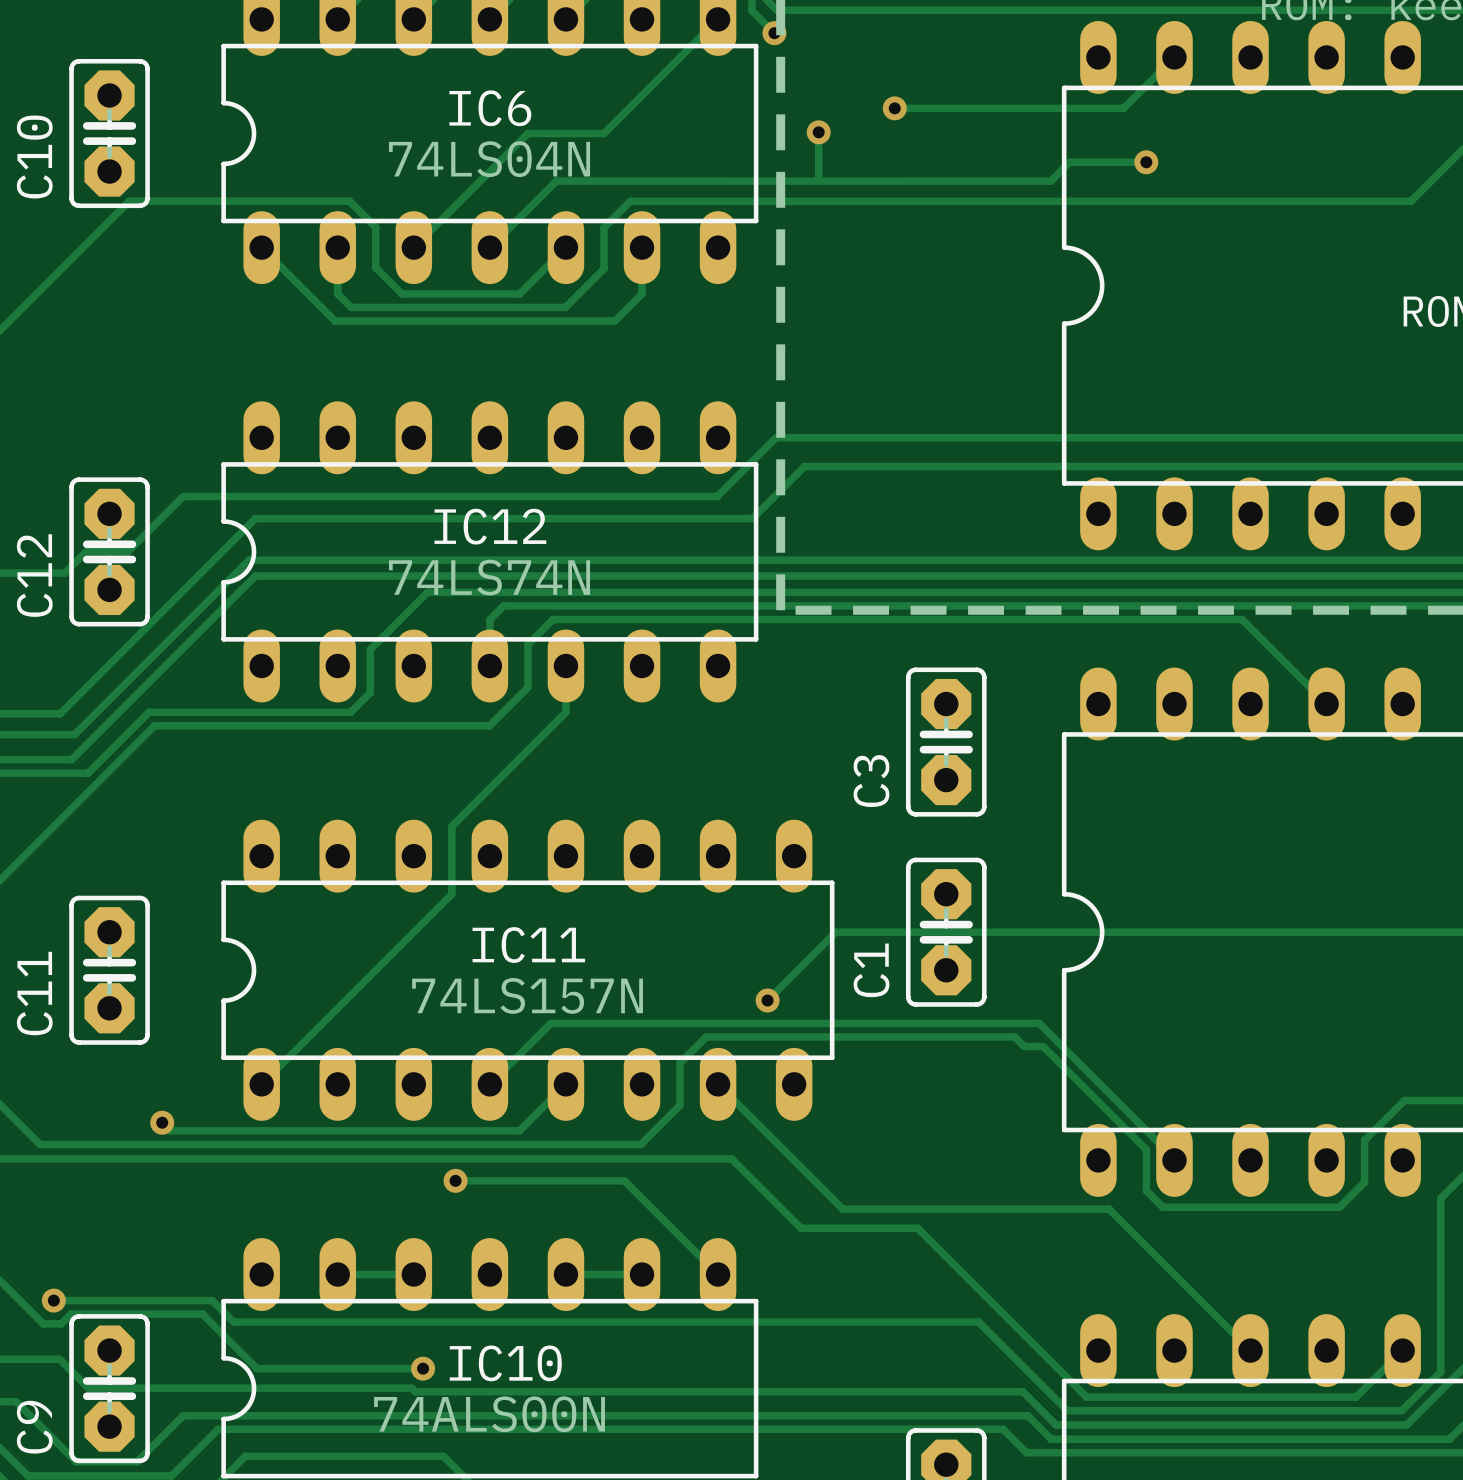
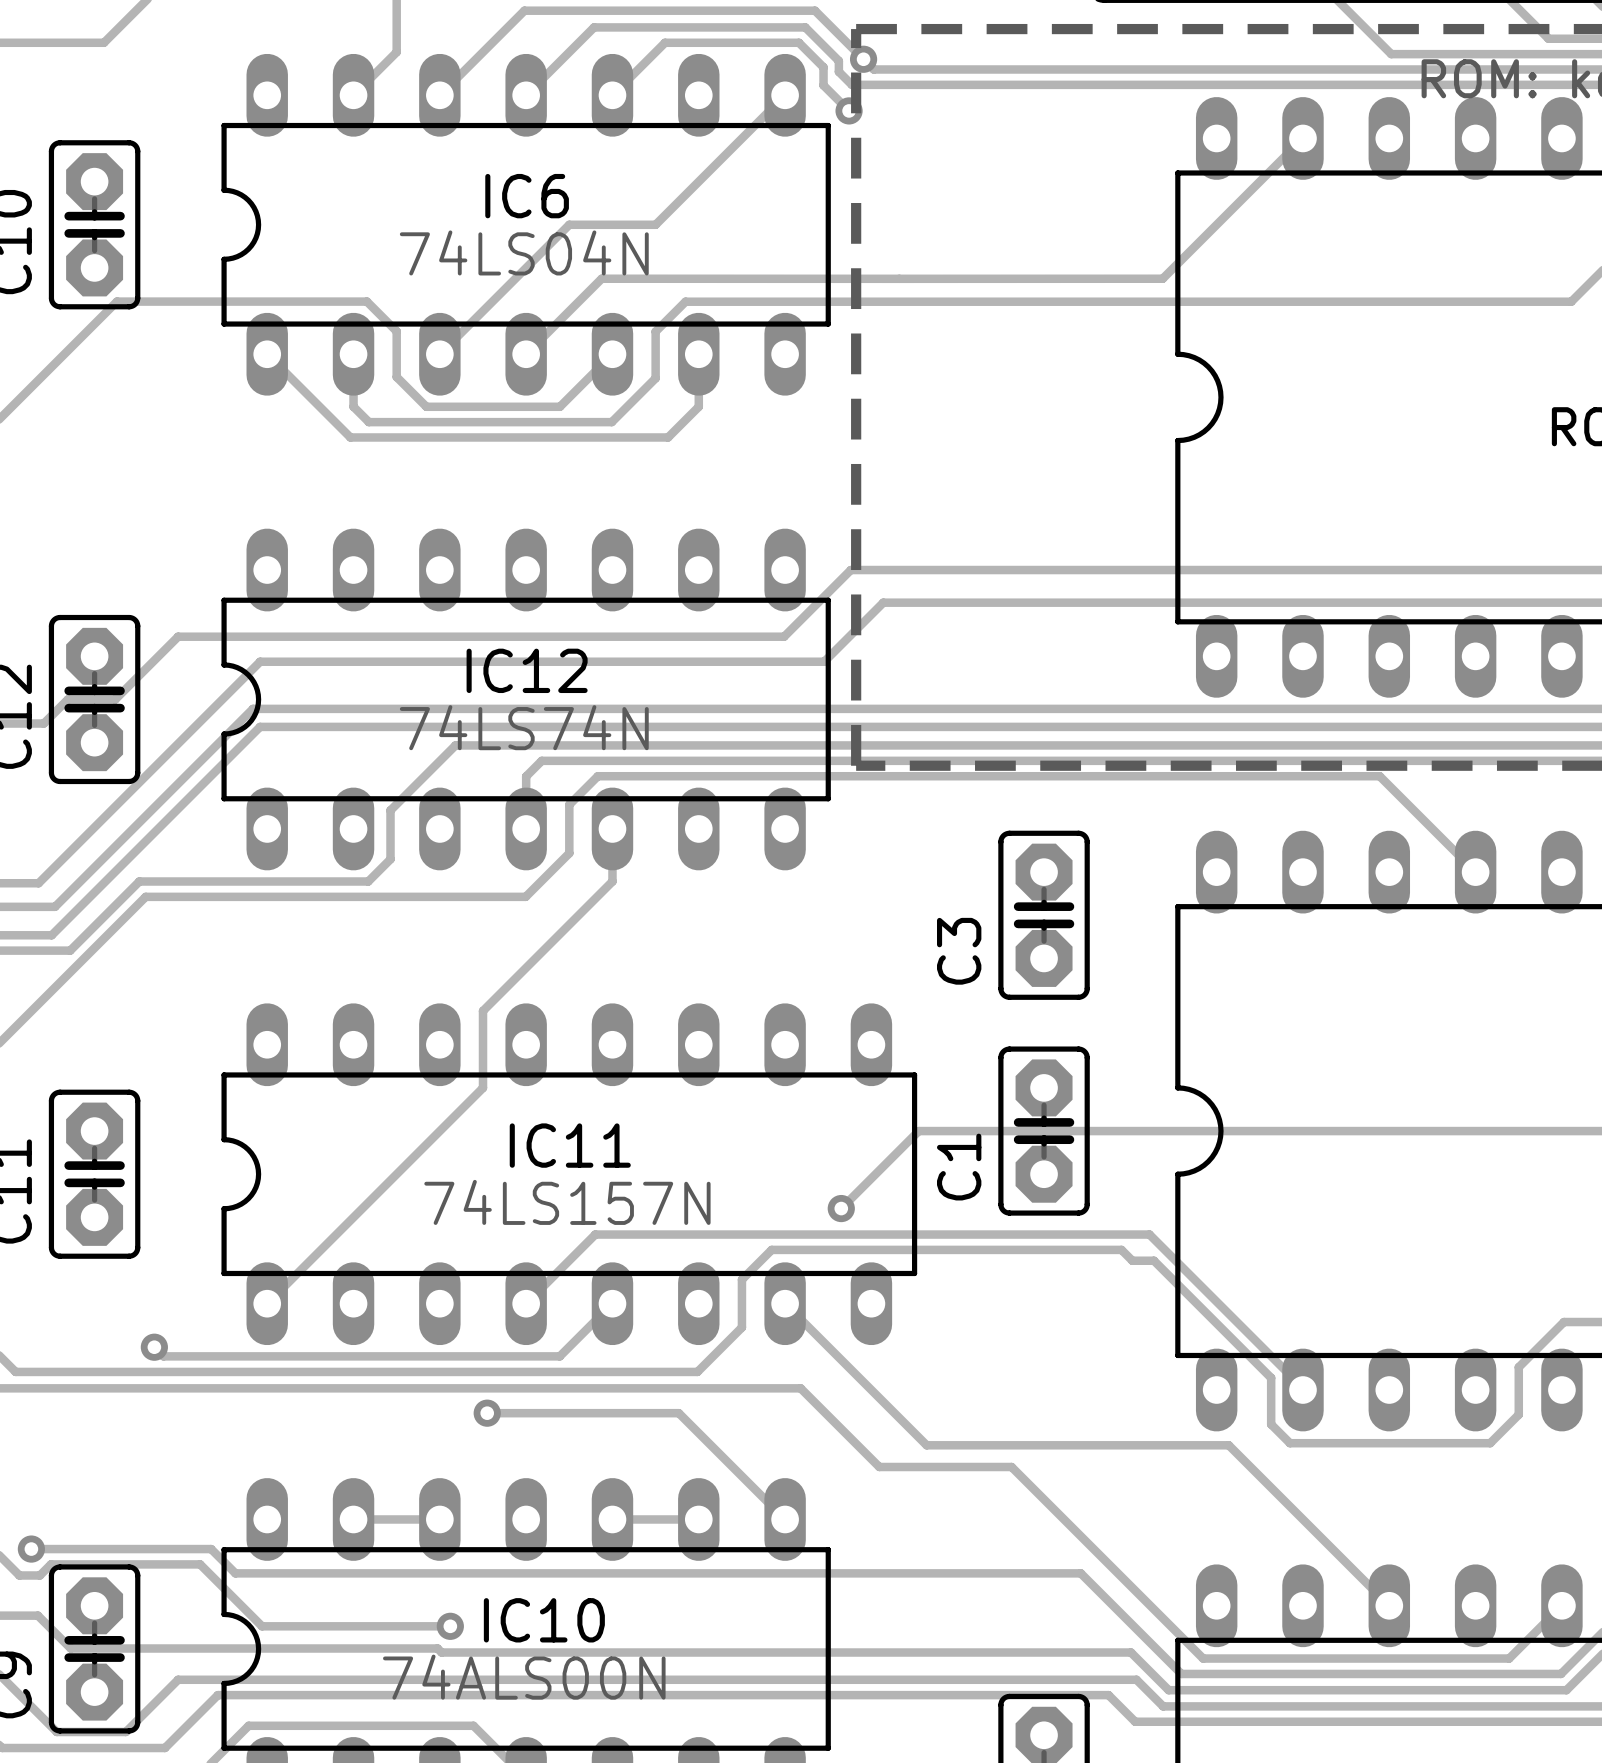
track: (894, 108) (1123, 108) -> none
via: (894, 108) -> none
track: (818, 132) (818, 181) -> none
via: (818, 132) -> none
track: (1069, 162) (1146, 162) -> (1184, 257) (1245, 196)
via: (1146, 162) -> none

